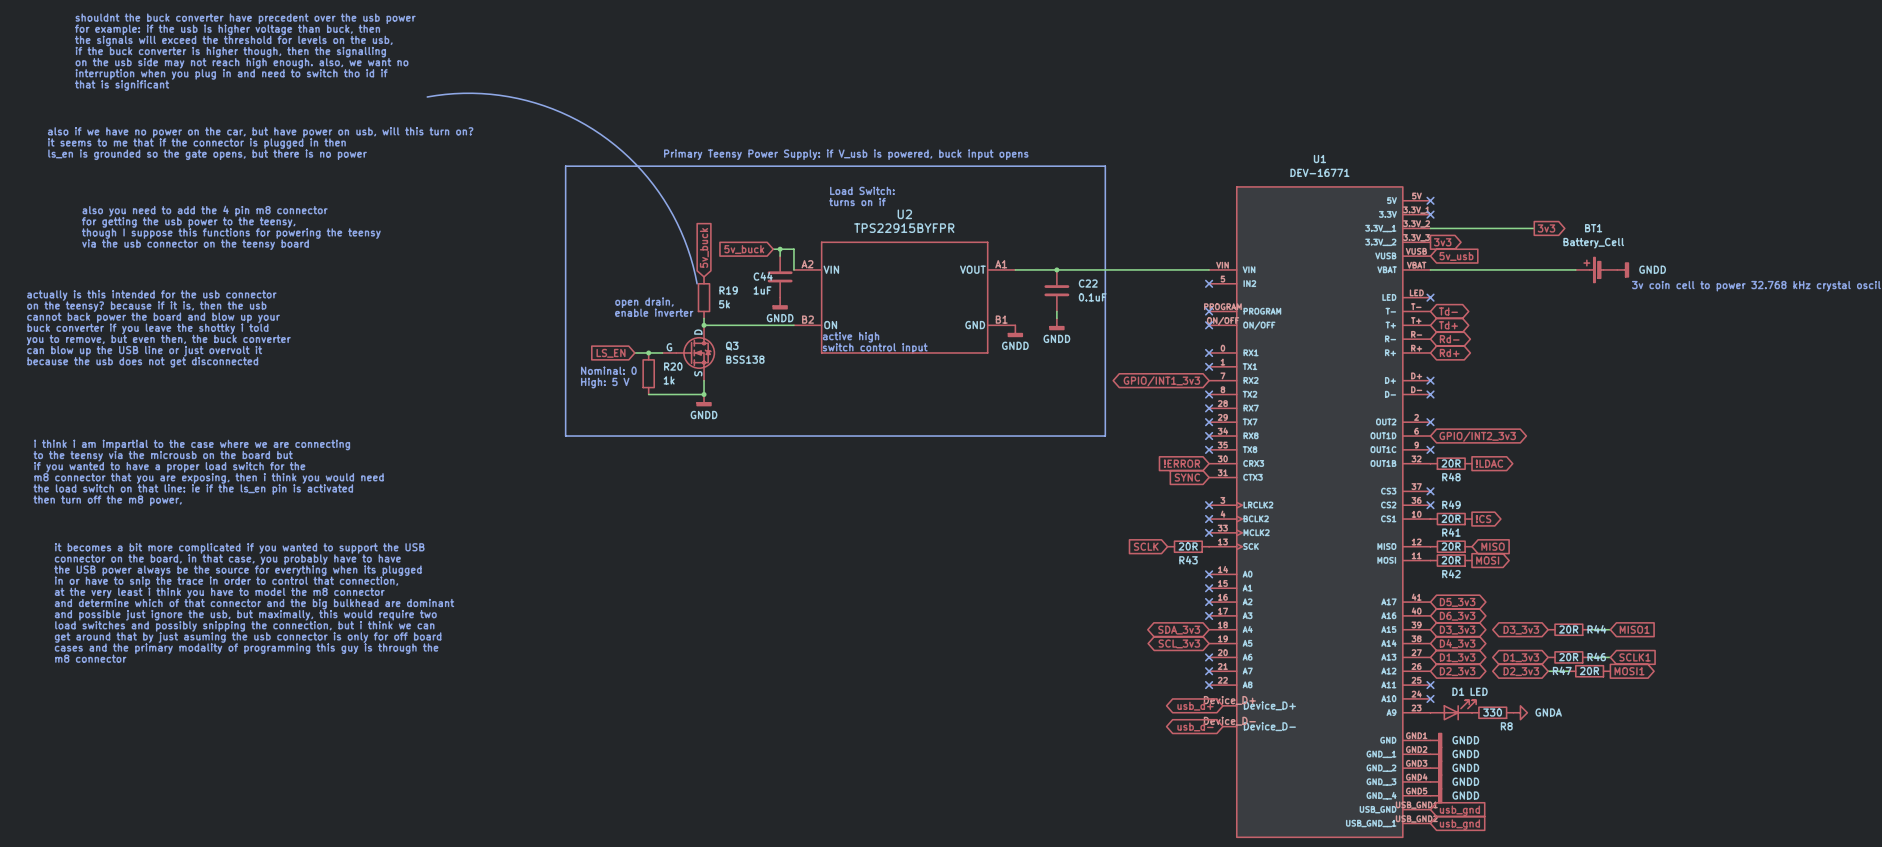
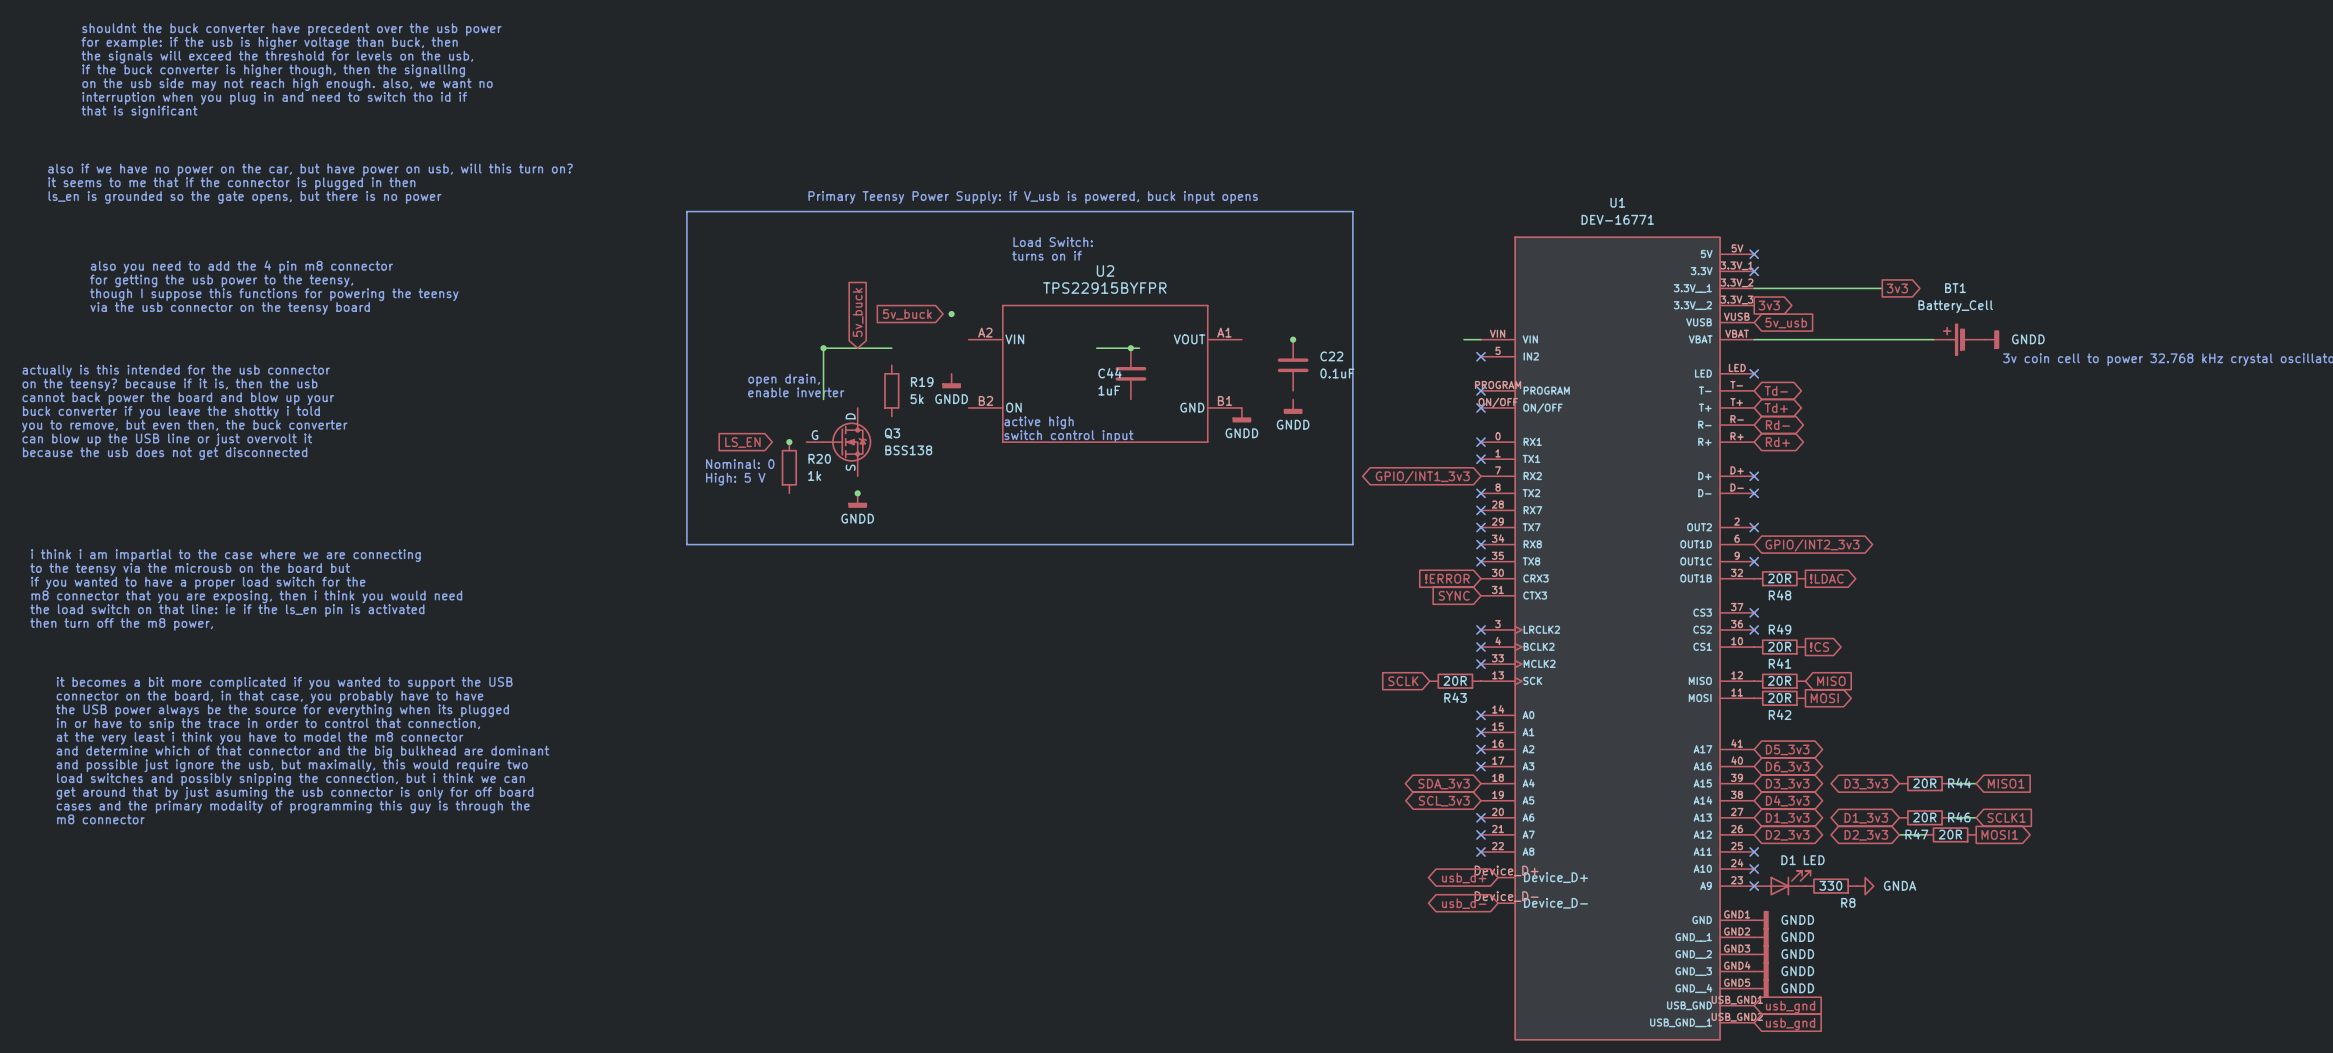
line: (427, 96) (472, 93) (517, 98) (561, 112) (600, 134) (635, 163) (663, 199) (684, 240) (697, 283) -> none
wire: (773, 249) (793, 249) (793, 269) -> none
wire: (780, 249) (780, 256) -> none
wire: (1015, 269) (1195, 269) -> none
junction: none -> (823, 348)
wire: none -> (891, 348) (823, 348) (823, 399)
C44 position: (780, 276) -> (1130, 373)
wire: none -> (1096, 348) (1139, 348)
junction: none -> (1130, 348)
R19 position: (704, 297) -> (891, 390)
wire: (1056, 311) (1056, 318) -> none
wire: (704, 318) (704, 325) (793, 325) -> none
junction: (704, 325) -> none
wire: (634, 352) (662, 352) -> none
wire: (704, 380) (704, 394) (648, 394) -> none
no-connect mark: none -> (1754, 886)

